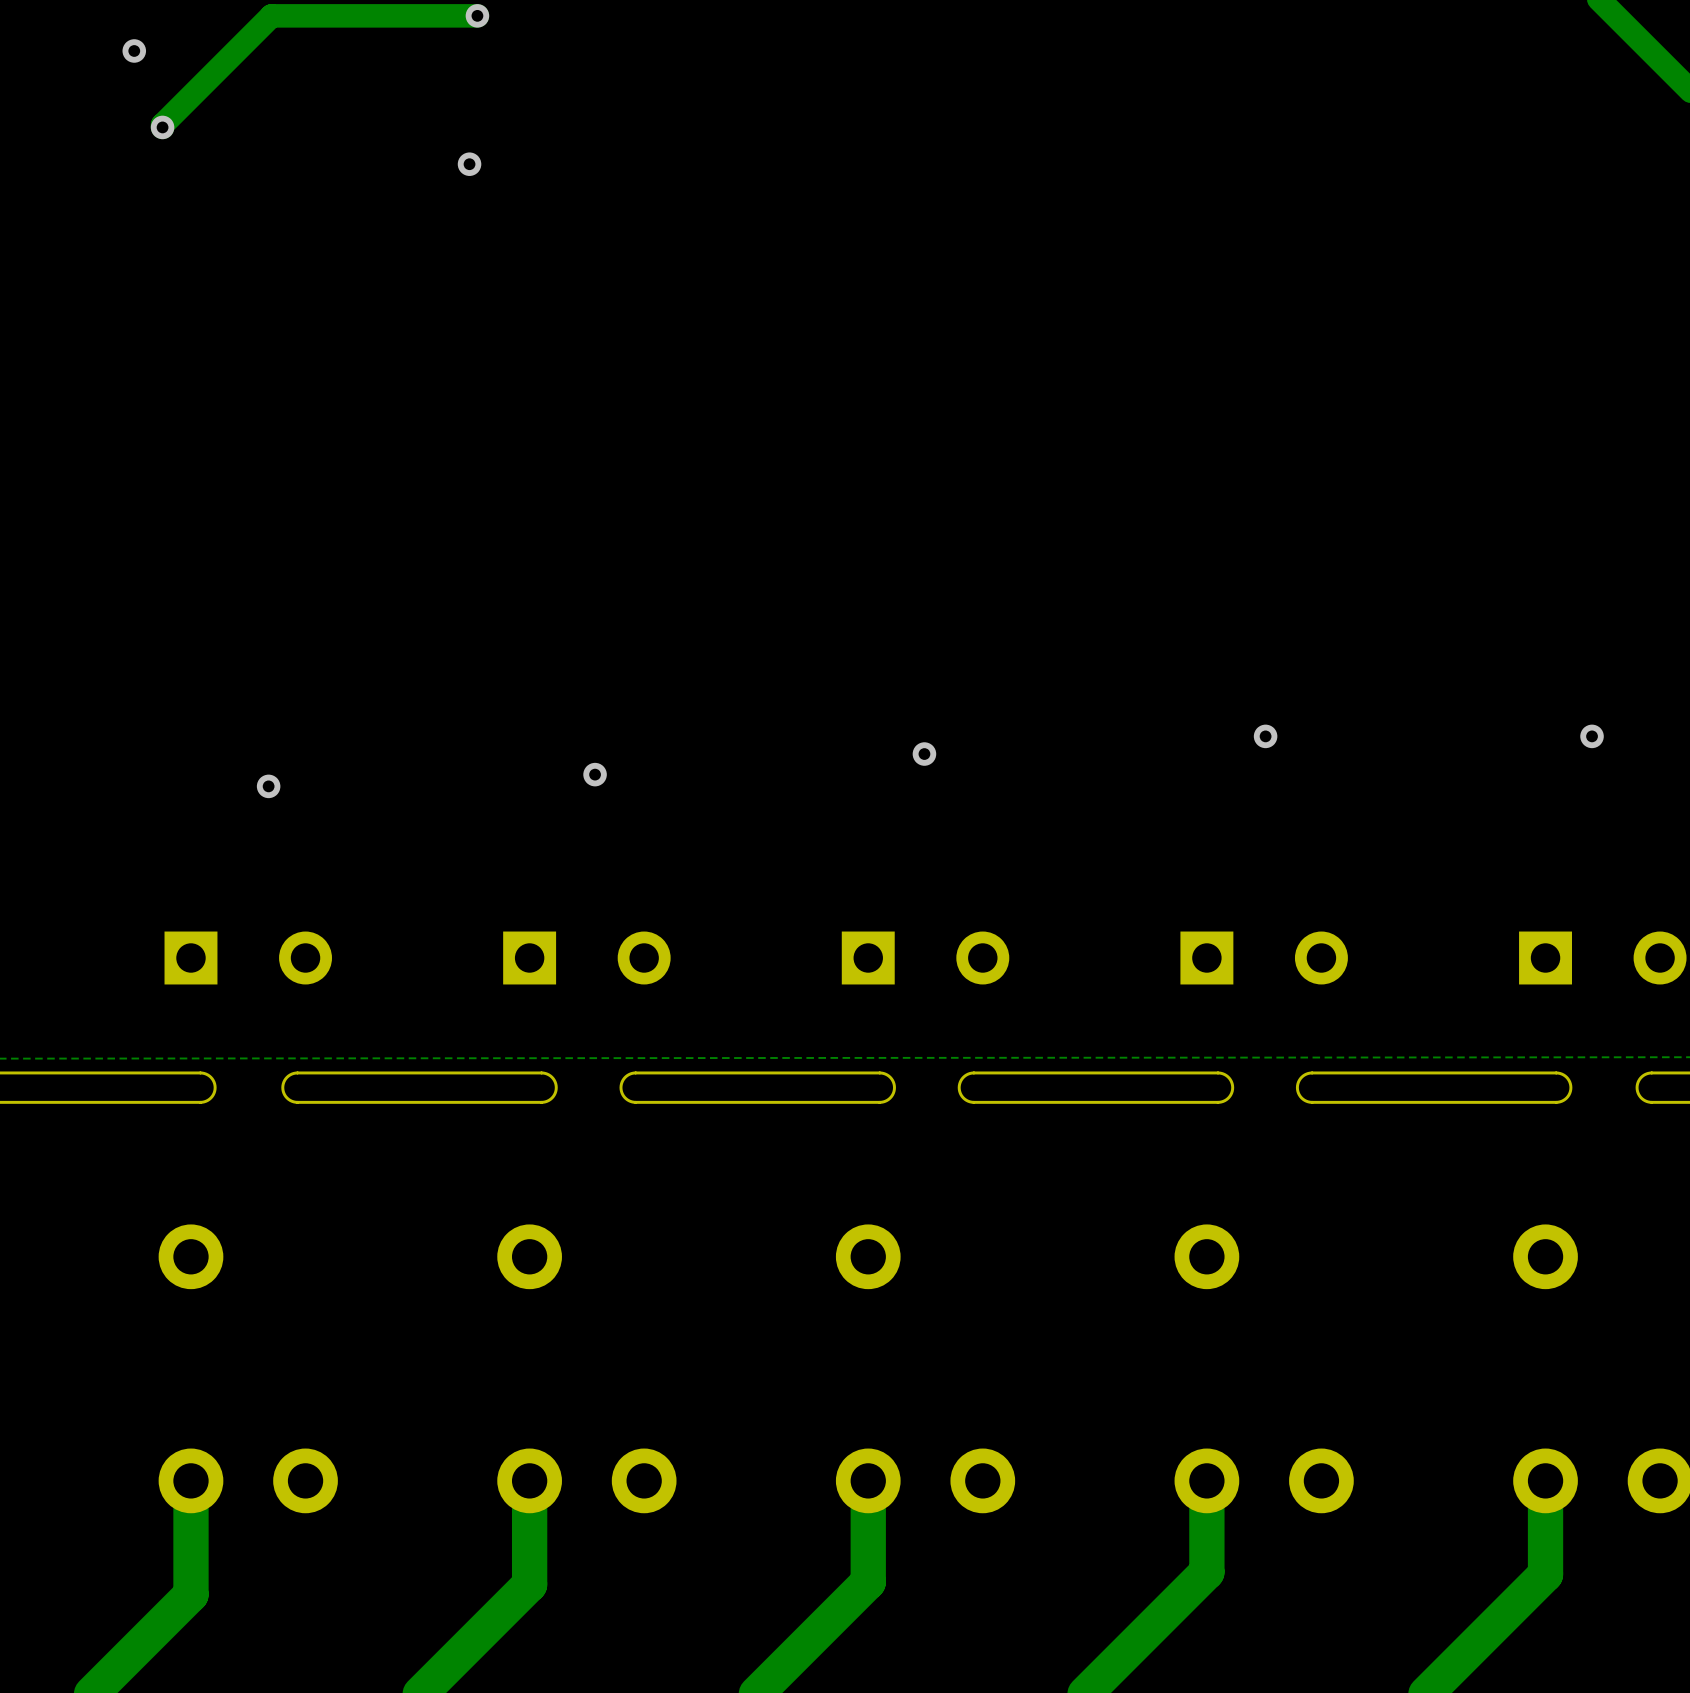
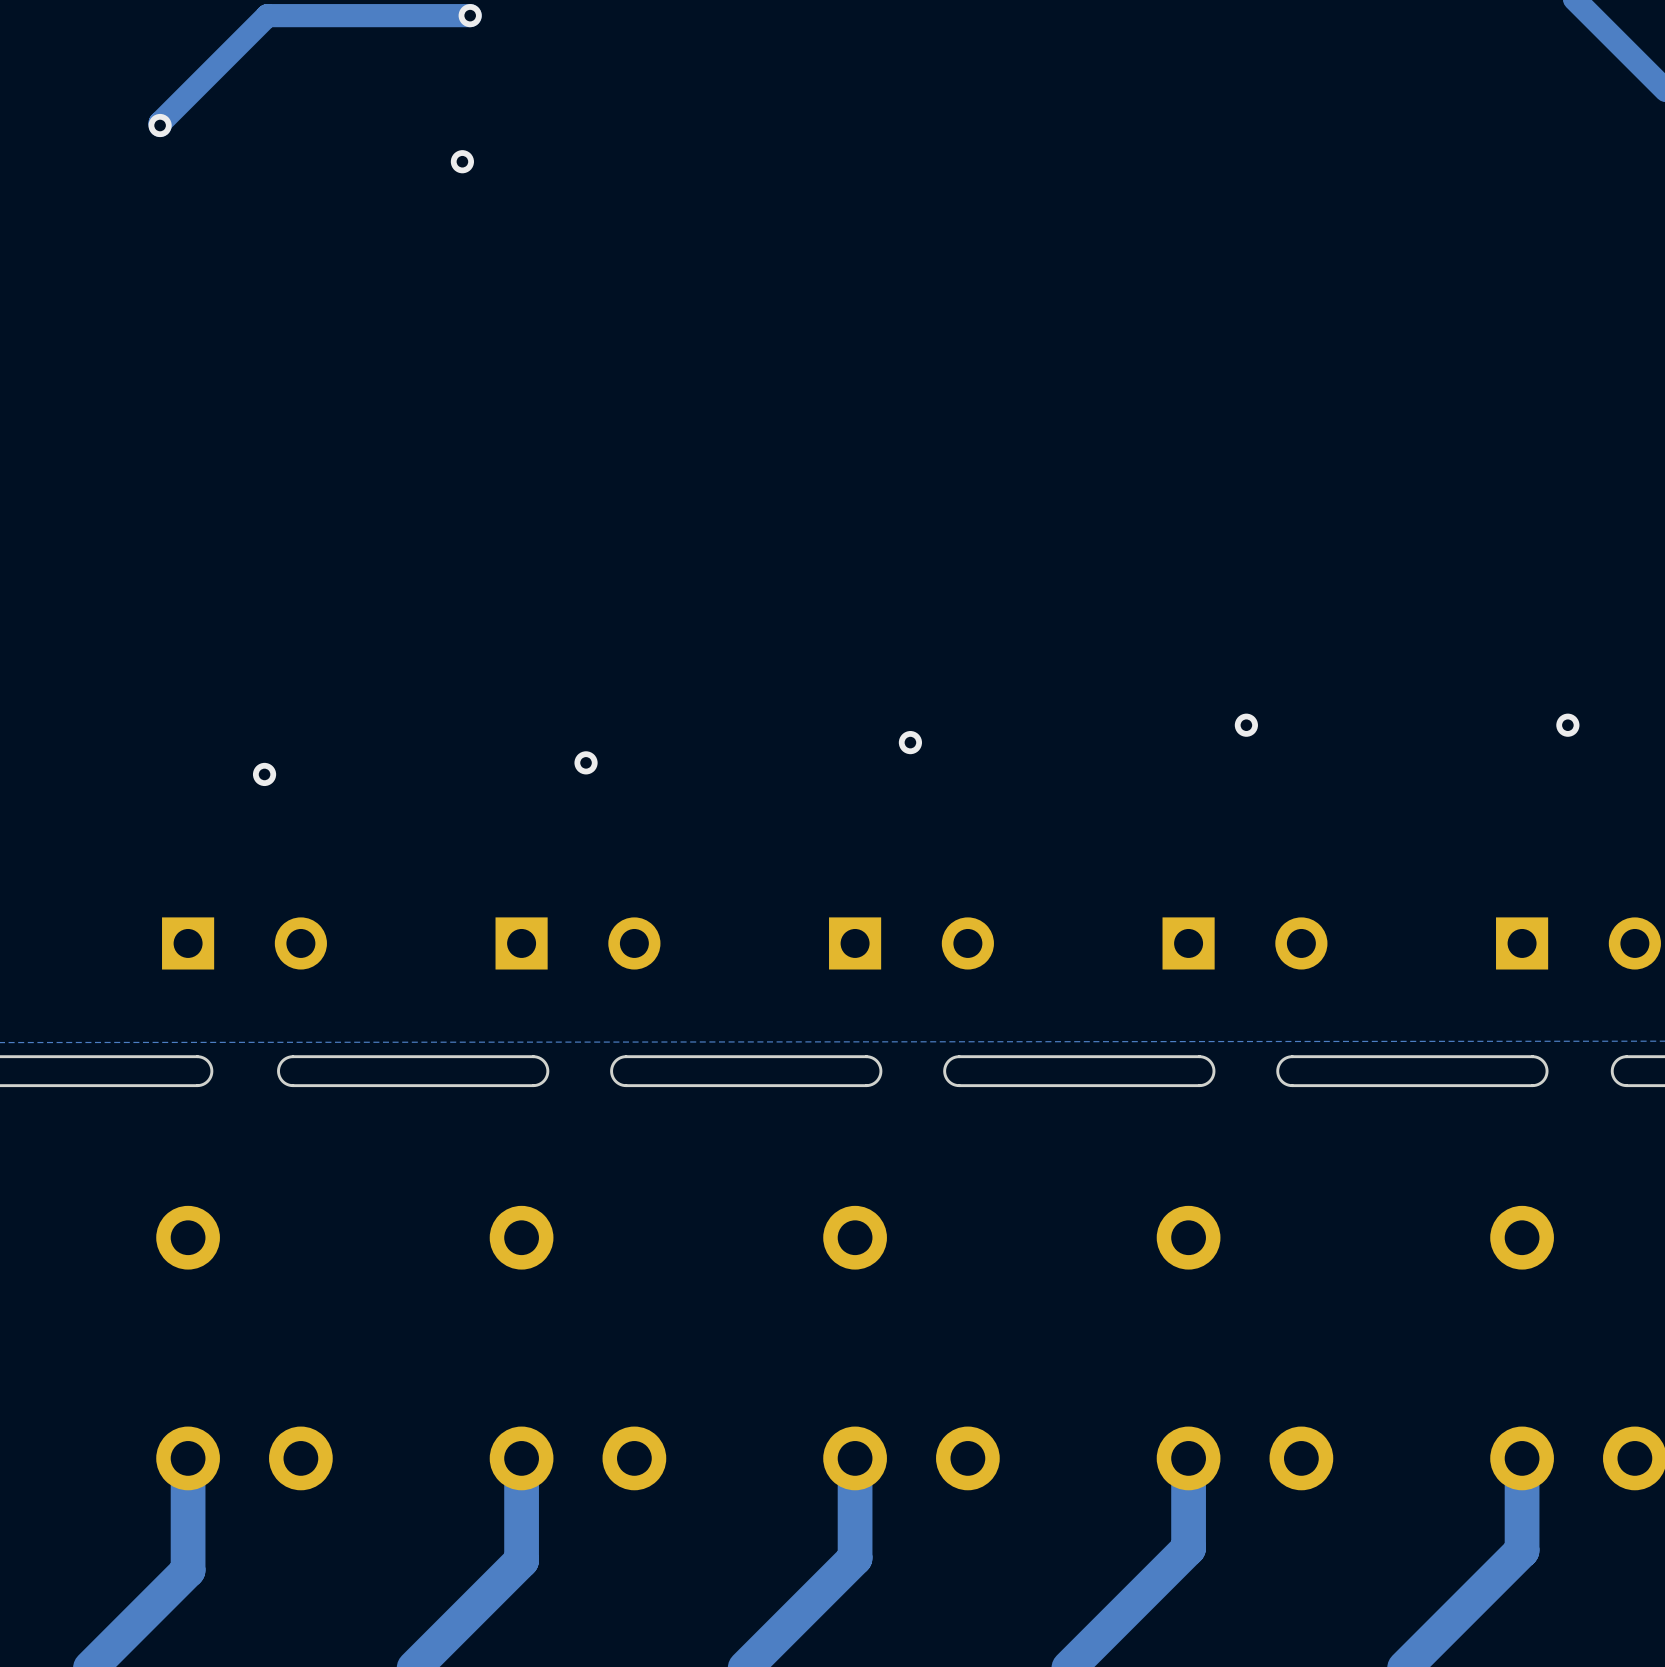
via: (134, 50) -> none

